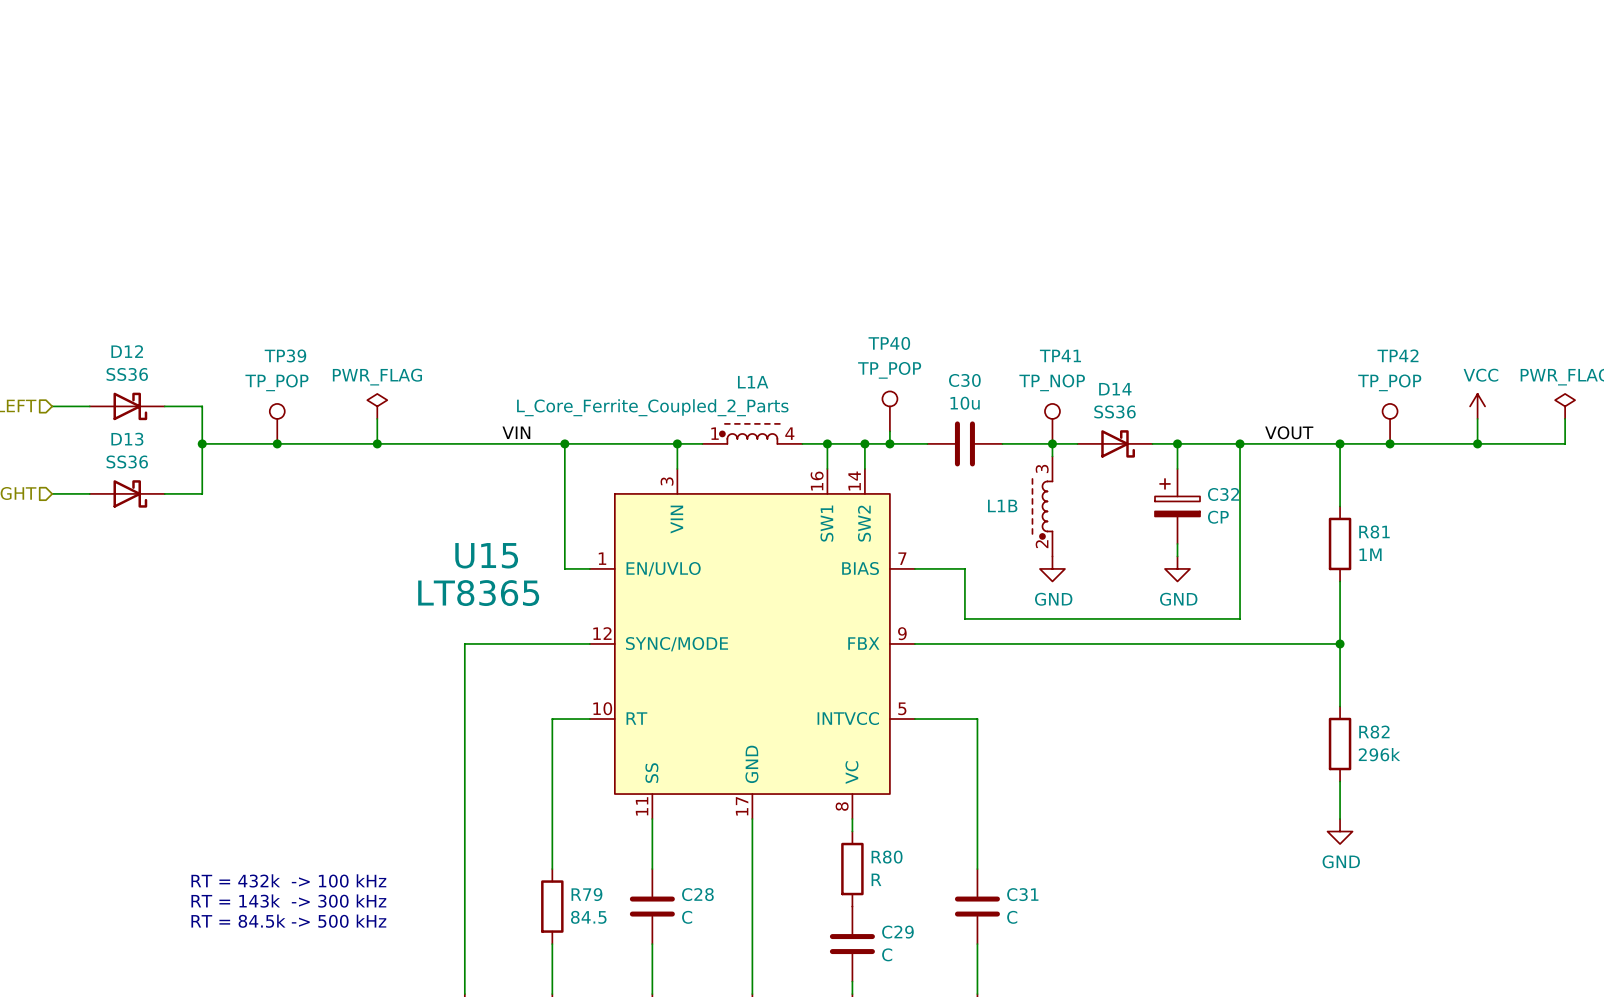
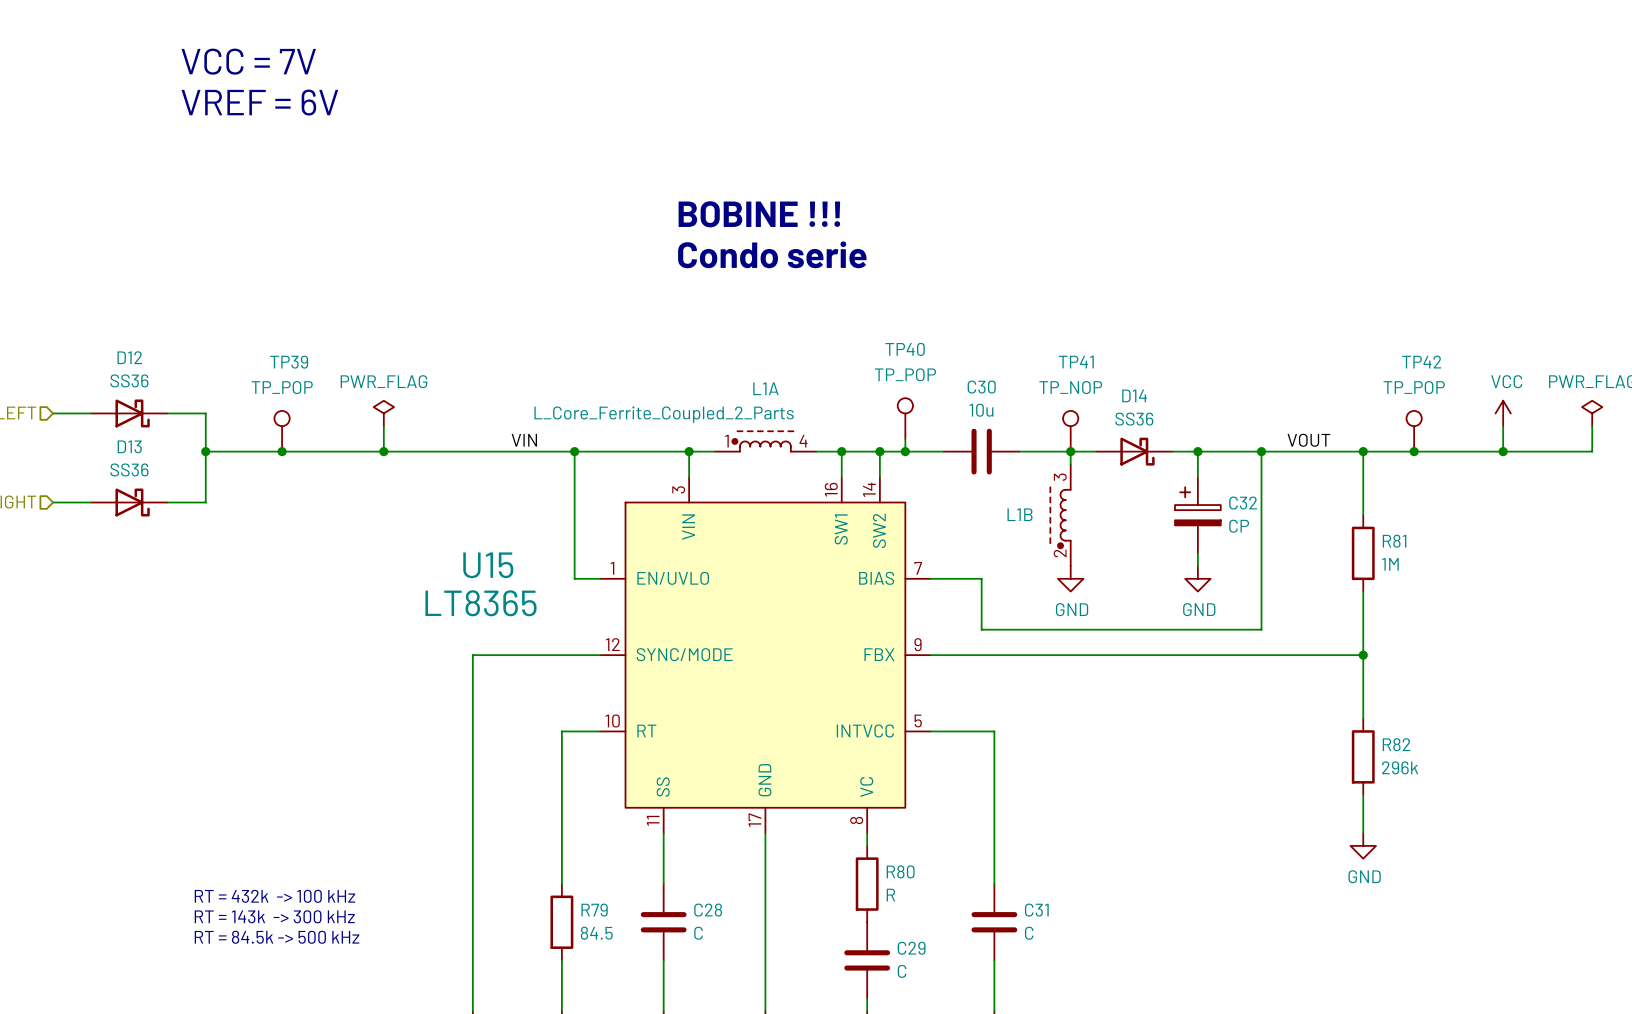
text: none -> VCC = 7V (248, 61)
text: none -> VREF = 6V (259, 102)
text: none -> BOBINE !!! (759, 214)
text: none -> Condo serie (772, 254)

